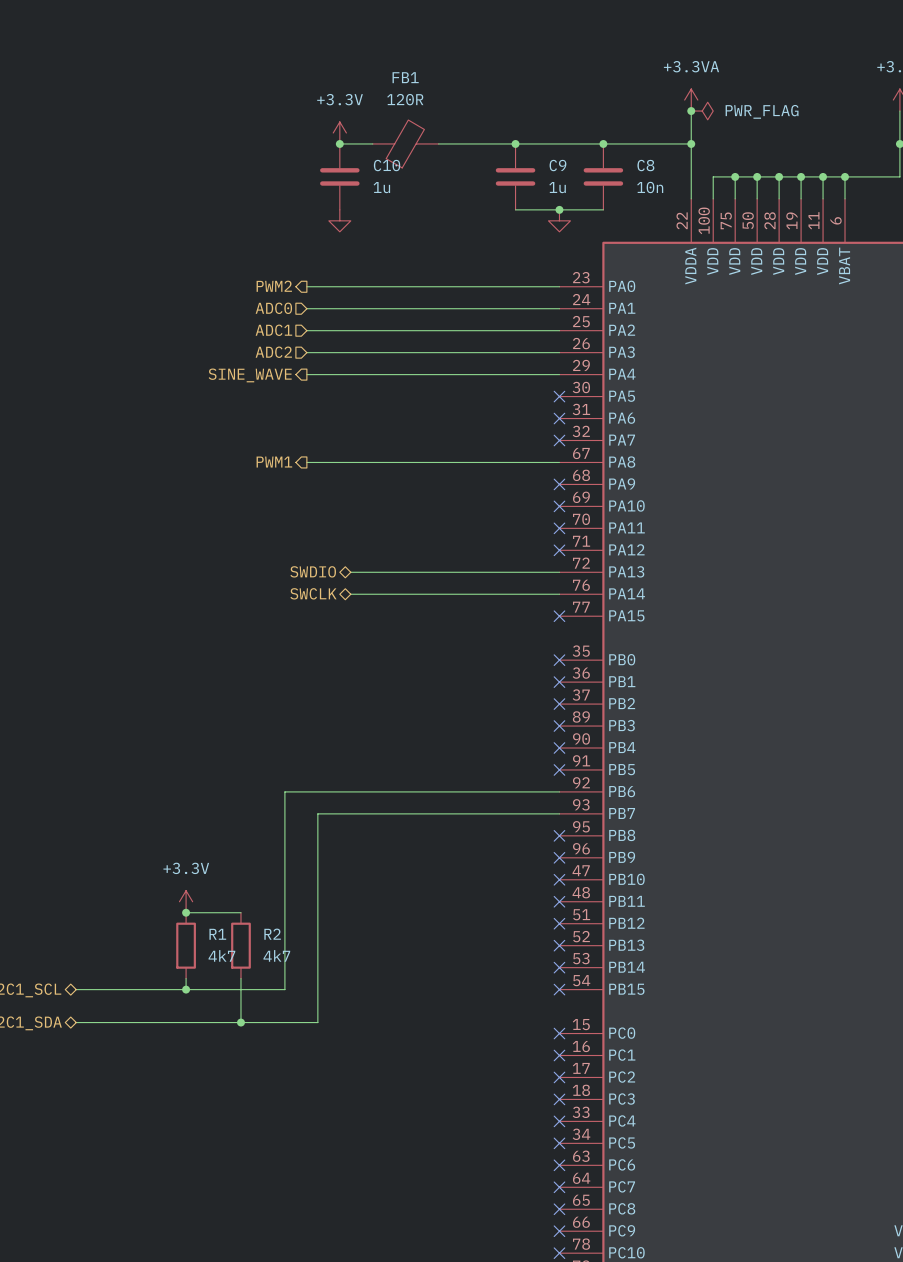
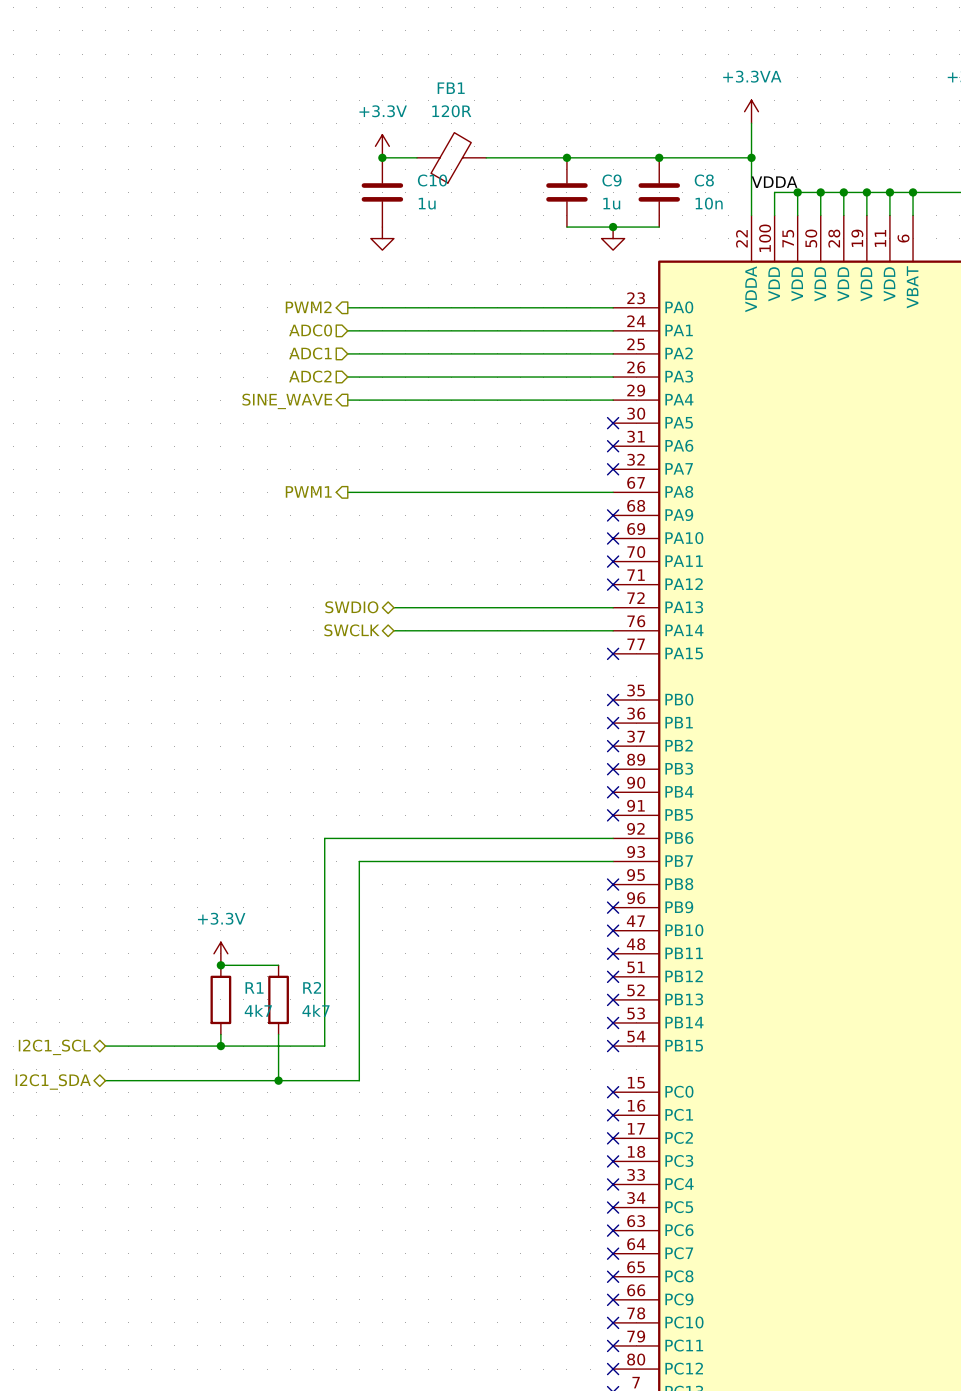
junction: (691, 111) -> none
power symbol: PWR_FLAG (702, 111) -> none
label: none -> VDDA (774, 182)

